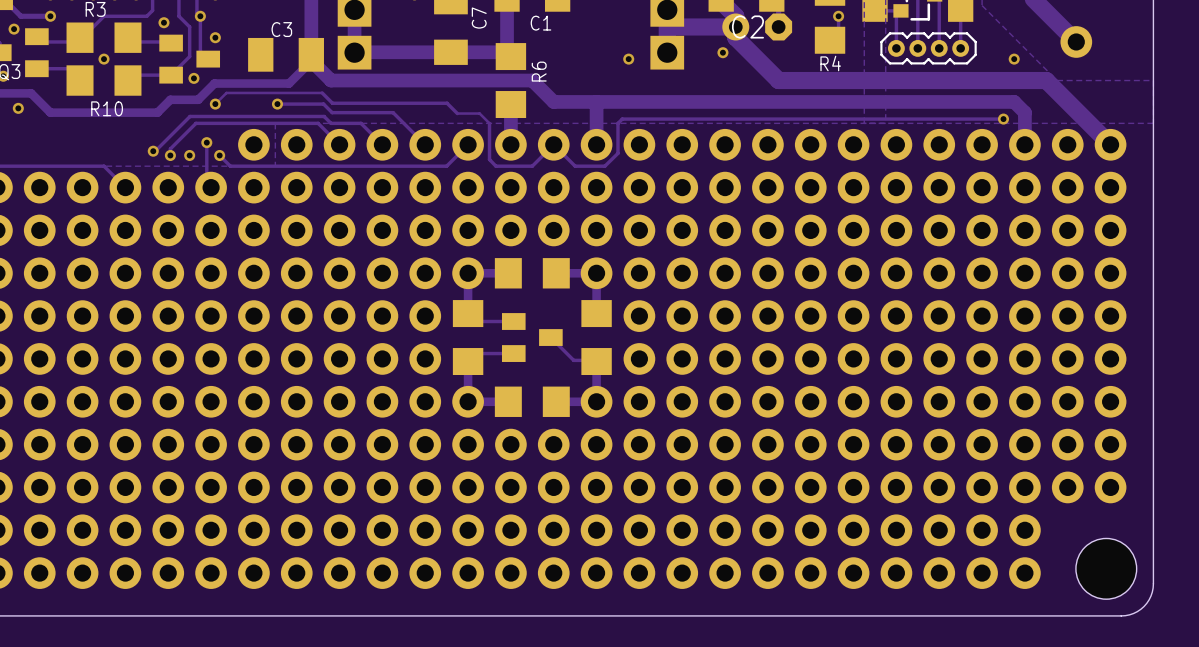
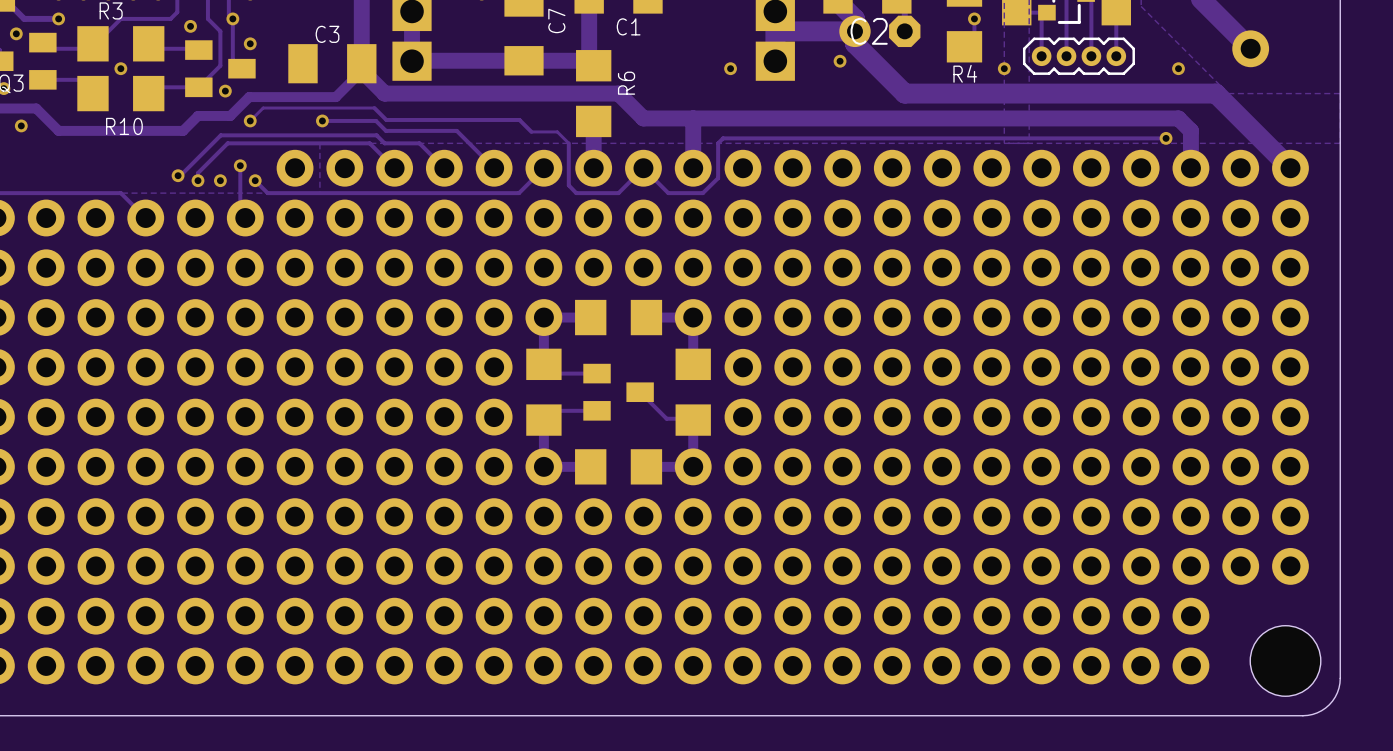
via: none -> (1004, 68)

